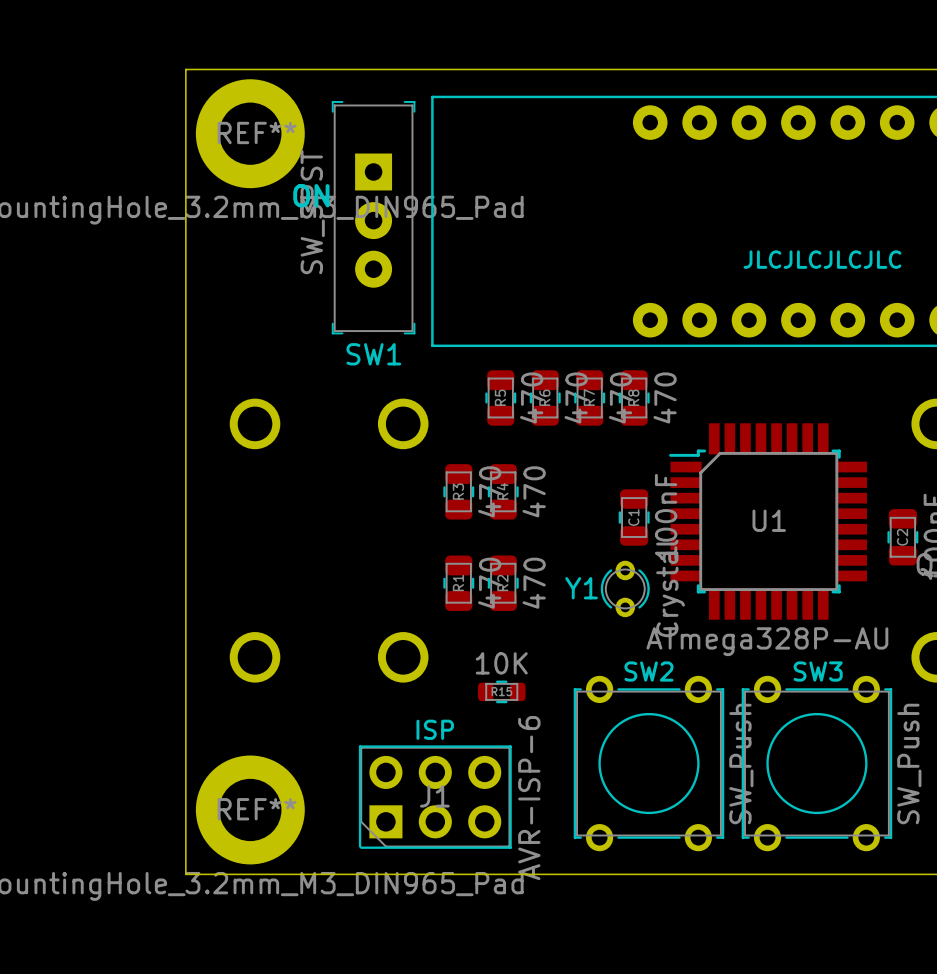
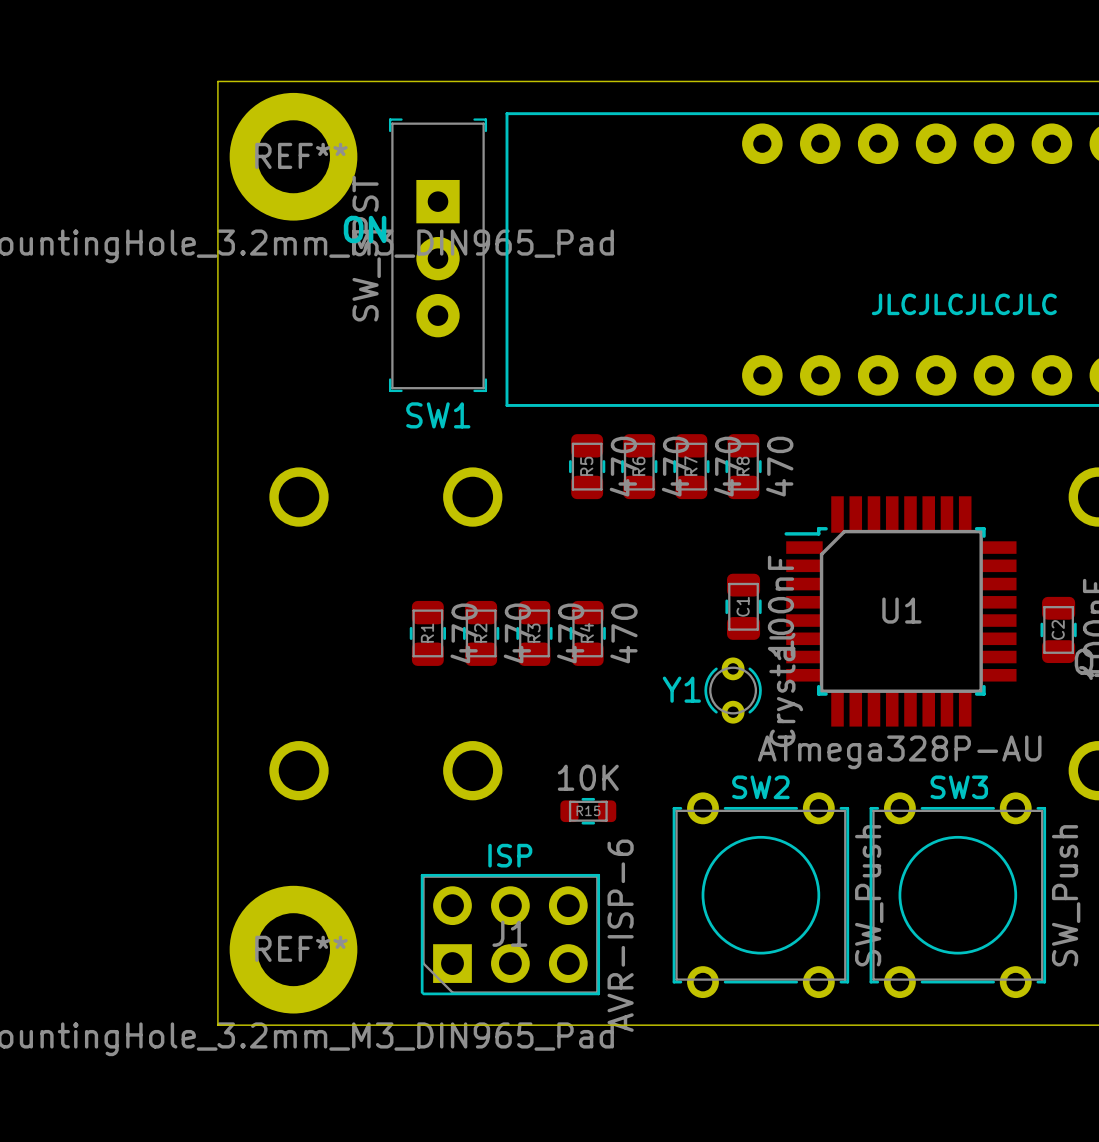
R3 position: (458, 491) -> (534, 633)
R4 position: (503, 491) -> (587, 633)
R1 position: (458, 583) -> (427, 633)
R2 position: (503, 583) -> (481, 633)

